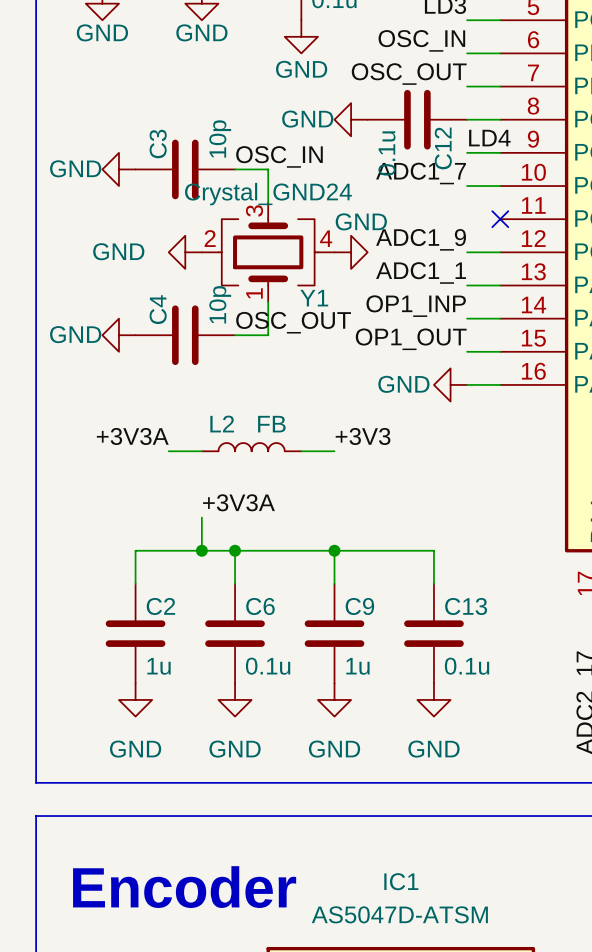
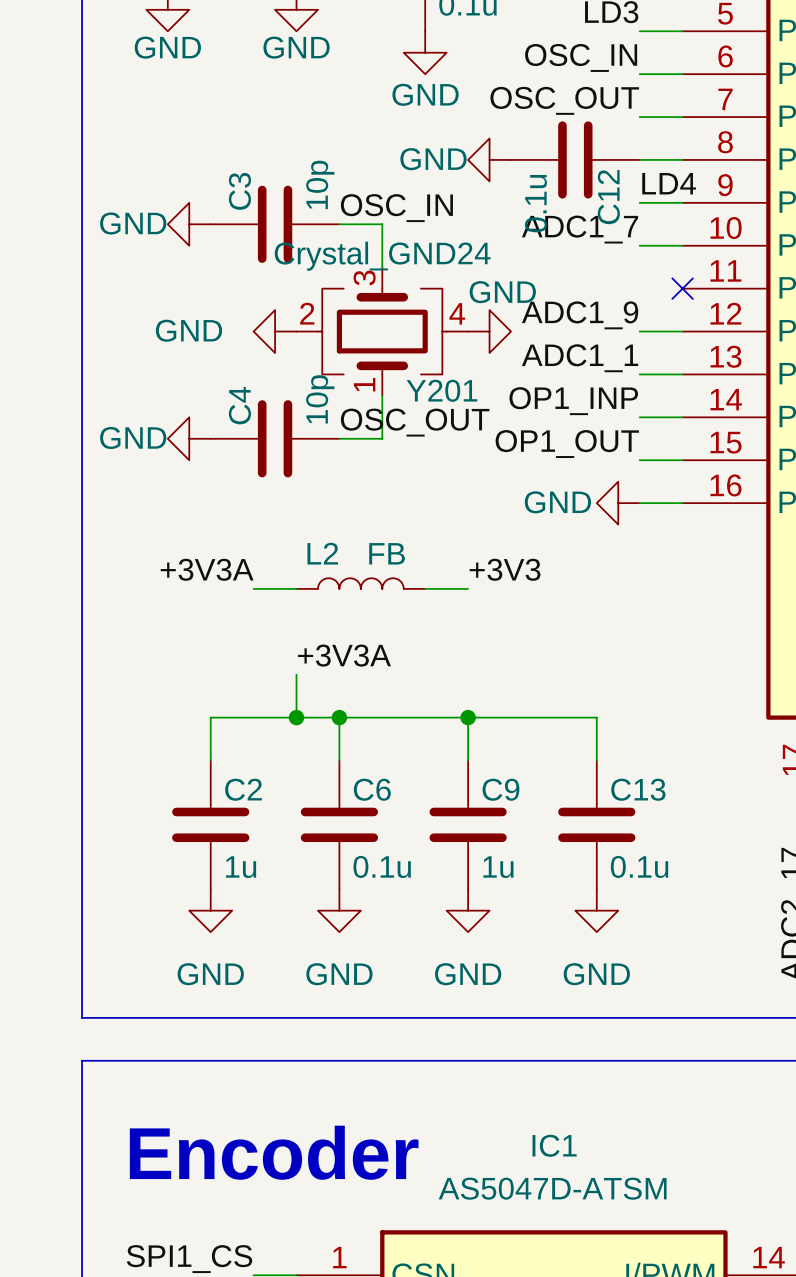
Y1 name: Y1 (314, 298) -> Y201 (441, 390)

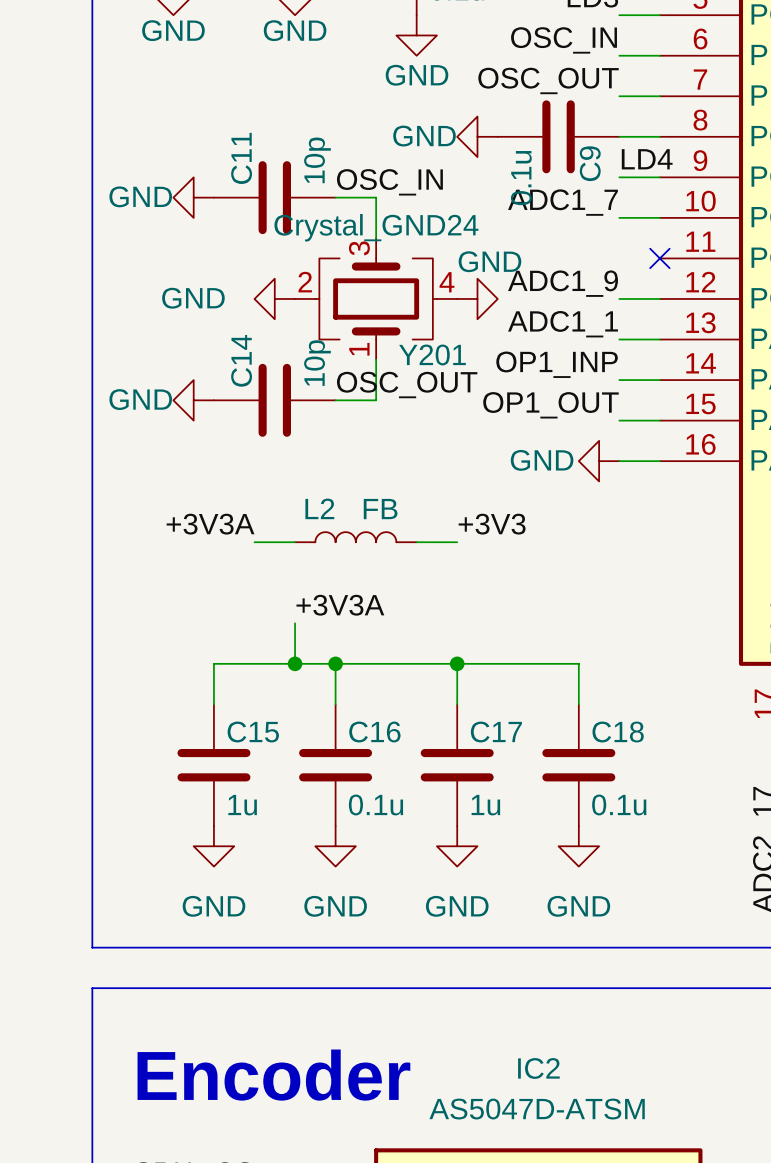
C3 name: C3 (239, 191) -> C11 (241, 158)
C12 name: C12 (608, 197) -> C9 (590, 163)
C4 name: C4 (239, 405) -> C14 (241, 360)
C2 name: C2 (243, 789) -> C15 (253, 732)
C6 name: C6 (372, 789) -> C16 (374, 732)
C9 name: C9 (500, 789) -> C17 (496, 732)
C13 name: C13 (638, 789) -> C18 (618, 732)
IC1 name: IC1 (554, 1145) -> IC2 (538, 1068)

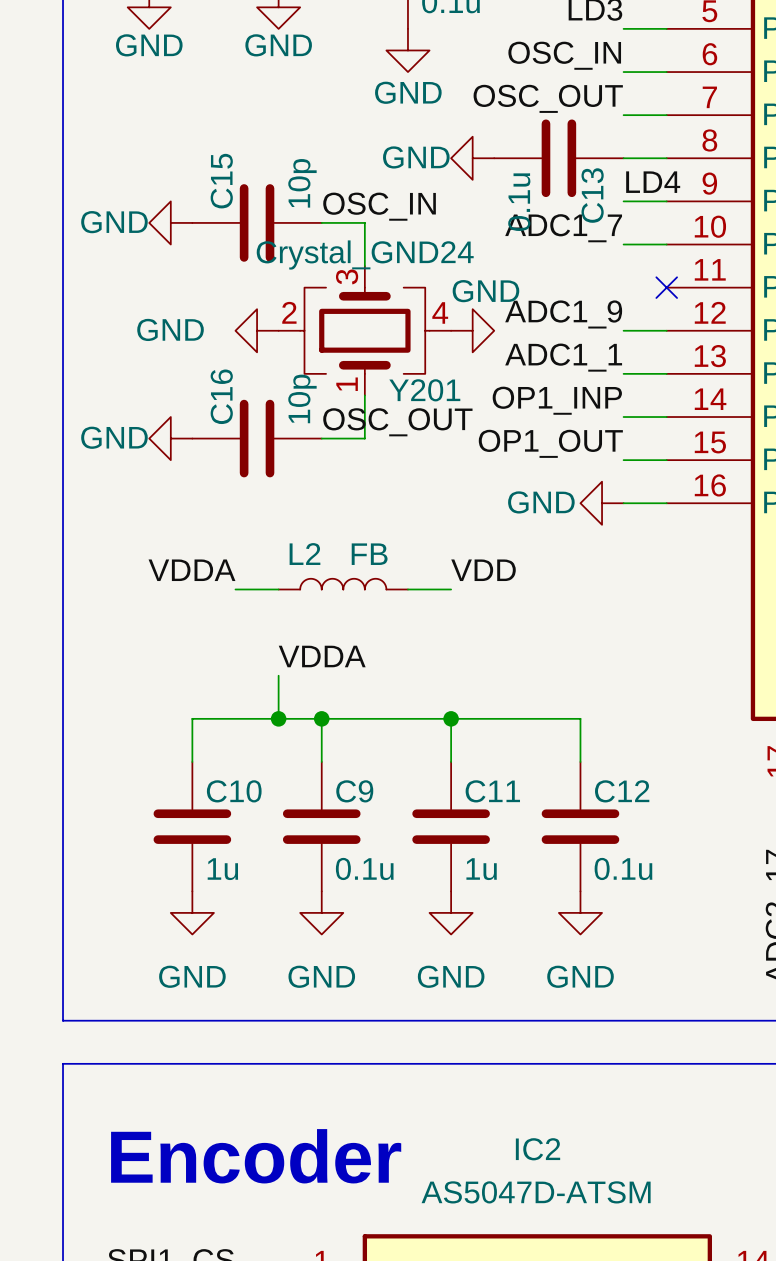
C11 name: C11 (241, 158) -> C15 (221, 181)
C9 name: C9 (590, 163) -> C13 (592, 195)
C14 name: C14 (241, 360) -> C16 (221, 396)
label: +3V3A (210, 524) -> VDDA (191, 570)
label: +3V3 (492, 524) -> VDD (483, 570)
label: +3V3A (340, 605) -> VDDA (322, 656)
C15 name: C15 (253, 732) -> C10 (234, 791)
C16 name: C16 (374, 732) -> C9 (354, 791)
C17 name: C17 (496, 732) -> C11 (492, 791)
C18 name: C18 (618, 732) -> C12 (622, 791)

